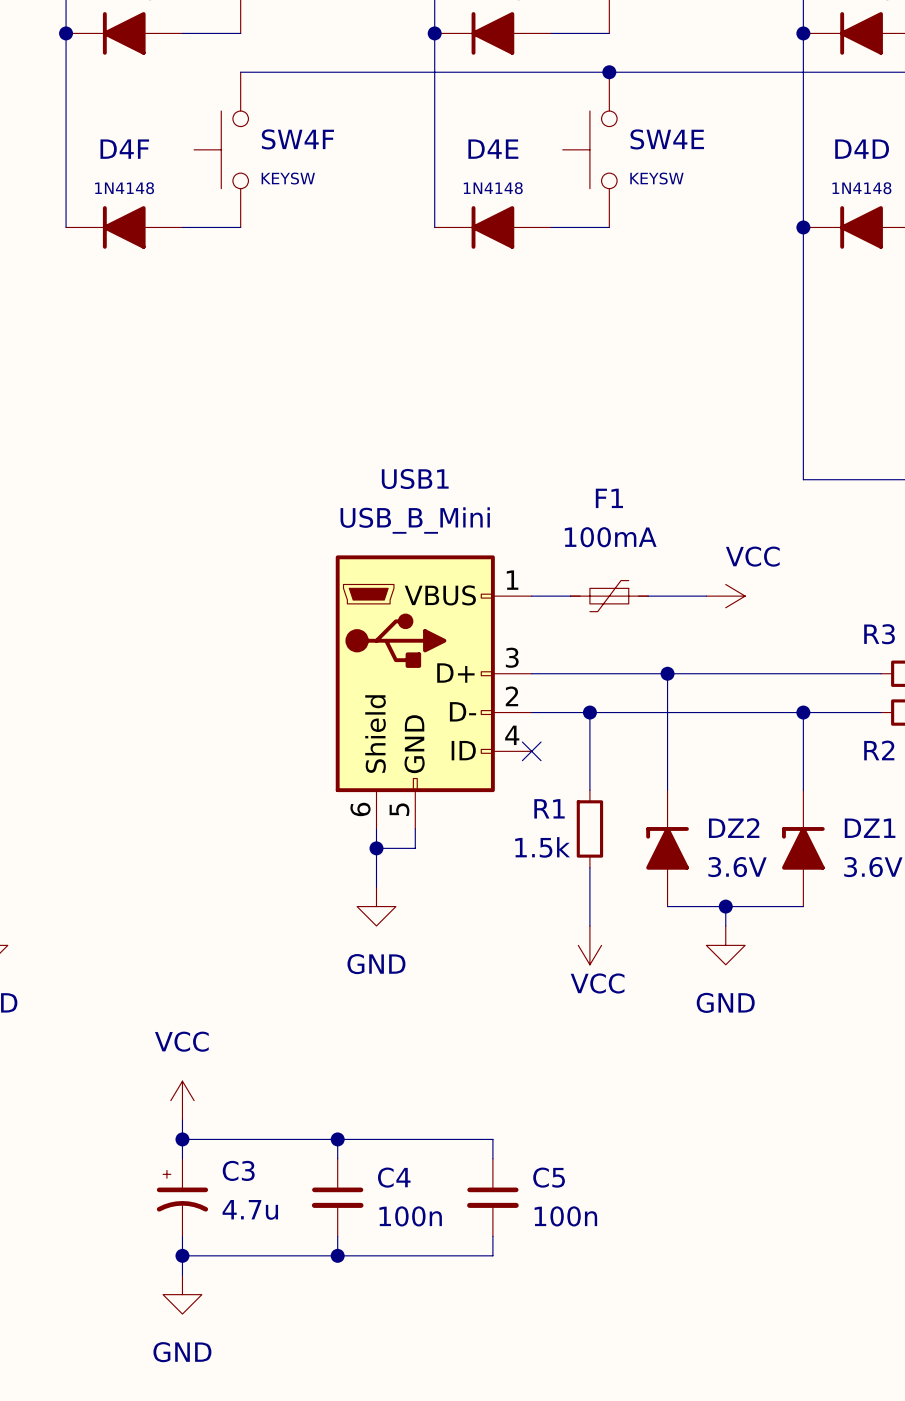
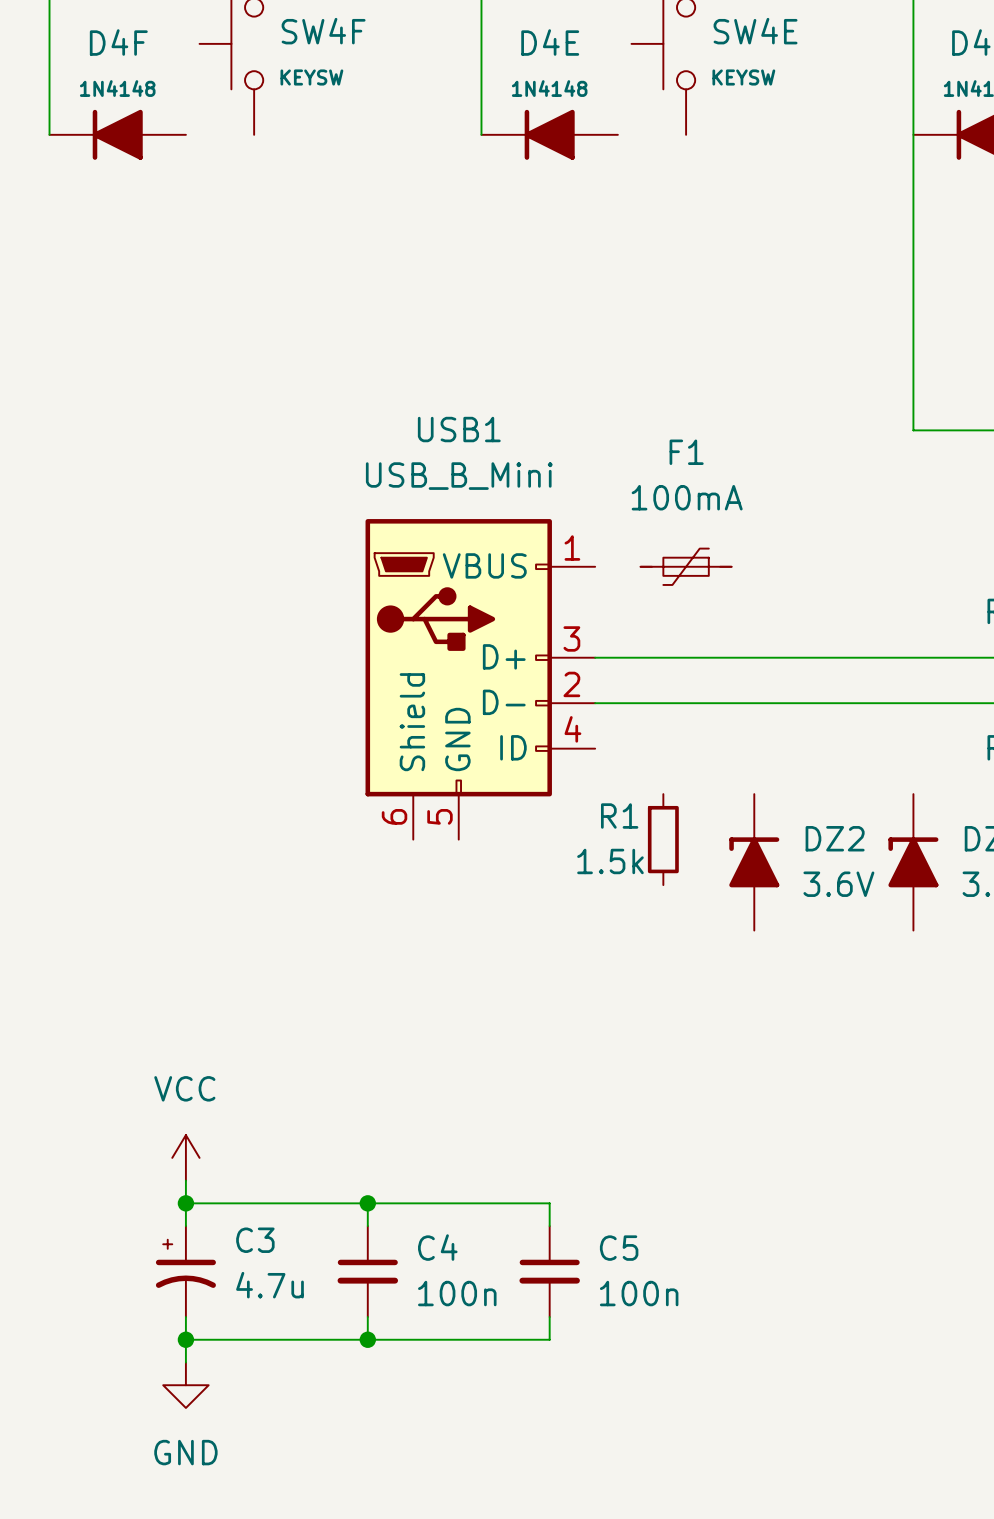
wire: (182, 227) (240, 227) -> none
wire: (551, 227) (609, 227) -> none
junction: (803, 227) -> none
wire: (531, 596) (570, 596) -> none
wire: (648, 596) (706, 596) -> none
power symbol: VCC (725, 596) -> none
wire: (667, 673) (667, 790) -> none
junction: (667, 673) -> none
wire: (589, 712) (589, 790) -> none
junction: (589, 712) -> none
wire: (803, 712) (803, 790) -> none
junction: (803, 712) -> none
no-connect mark: (531, 751) -> none
wire: (376, 828) (376, 887) -> none
wire: (415, 828) (415, 848) (376, 848) -> none
junction: (376, 848) -> none
wire: (589, 867) (589, 925) -> none
power symbol: GND (376, 906) -> none
wire: (667, 906) (803, 906) -> none
wire: (725, 906) (725, 925) -> none
junction: (725, 906) -> none
power symbol: VCC (589, 945) -> none
power symbol: GND (725, 945) -> none

